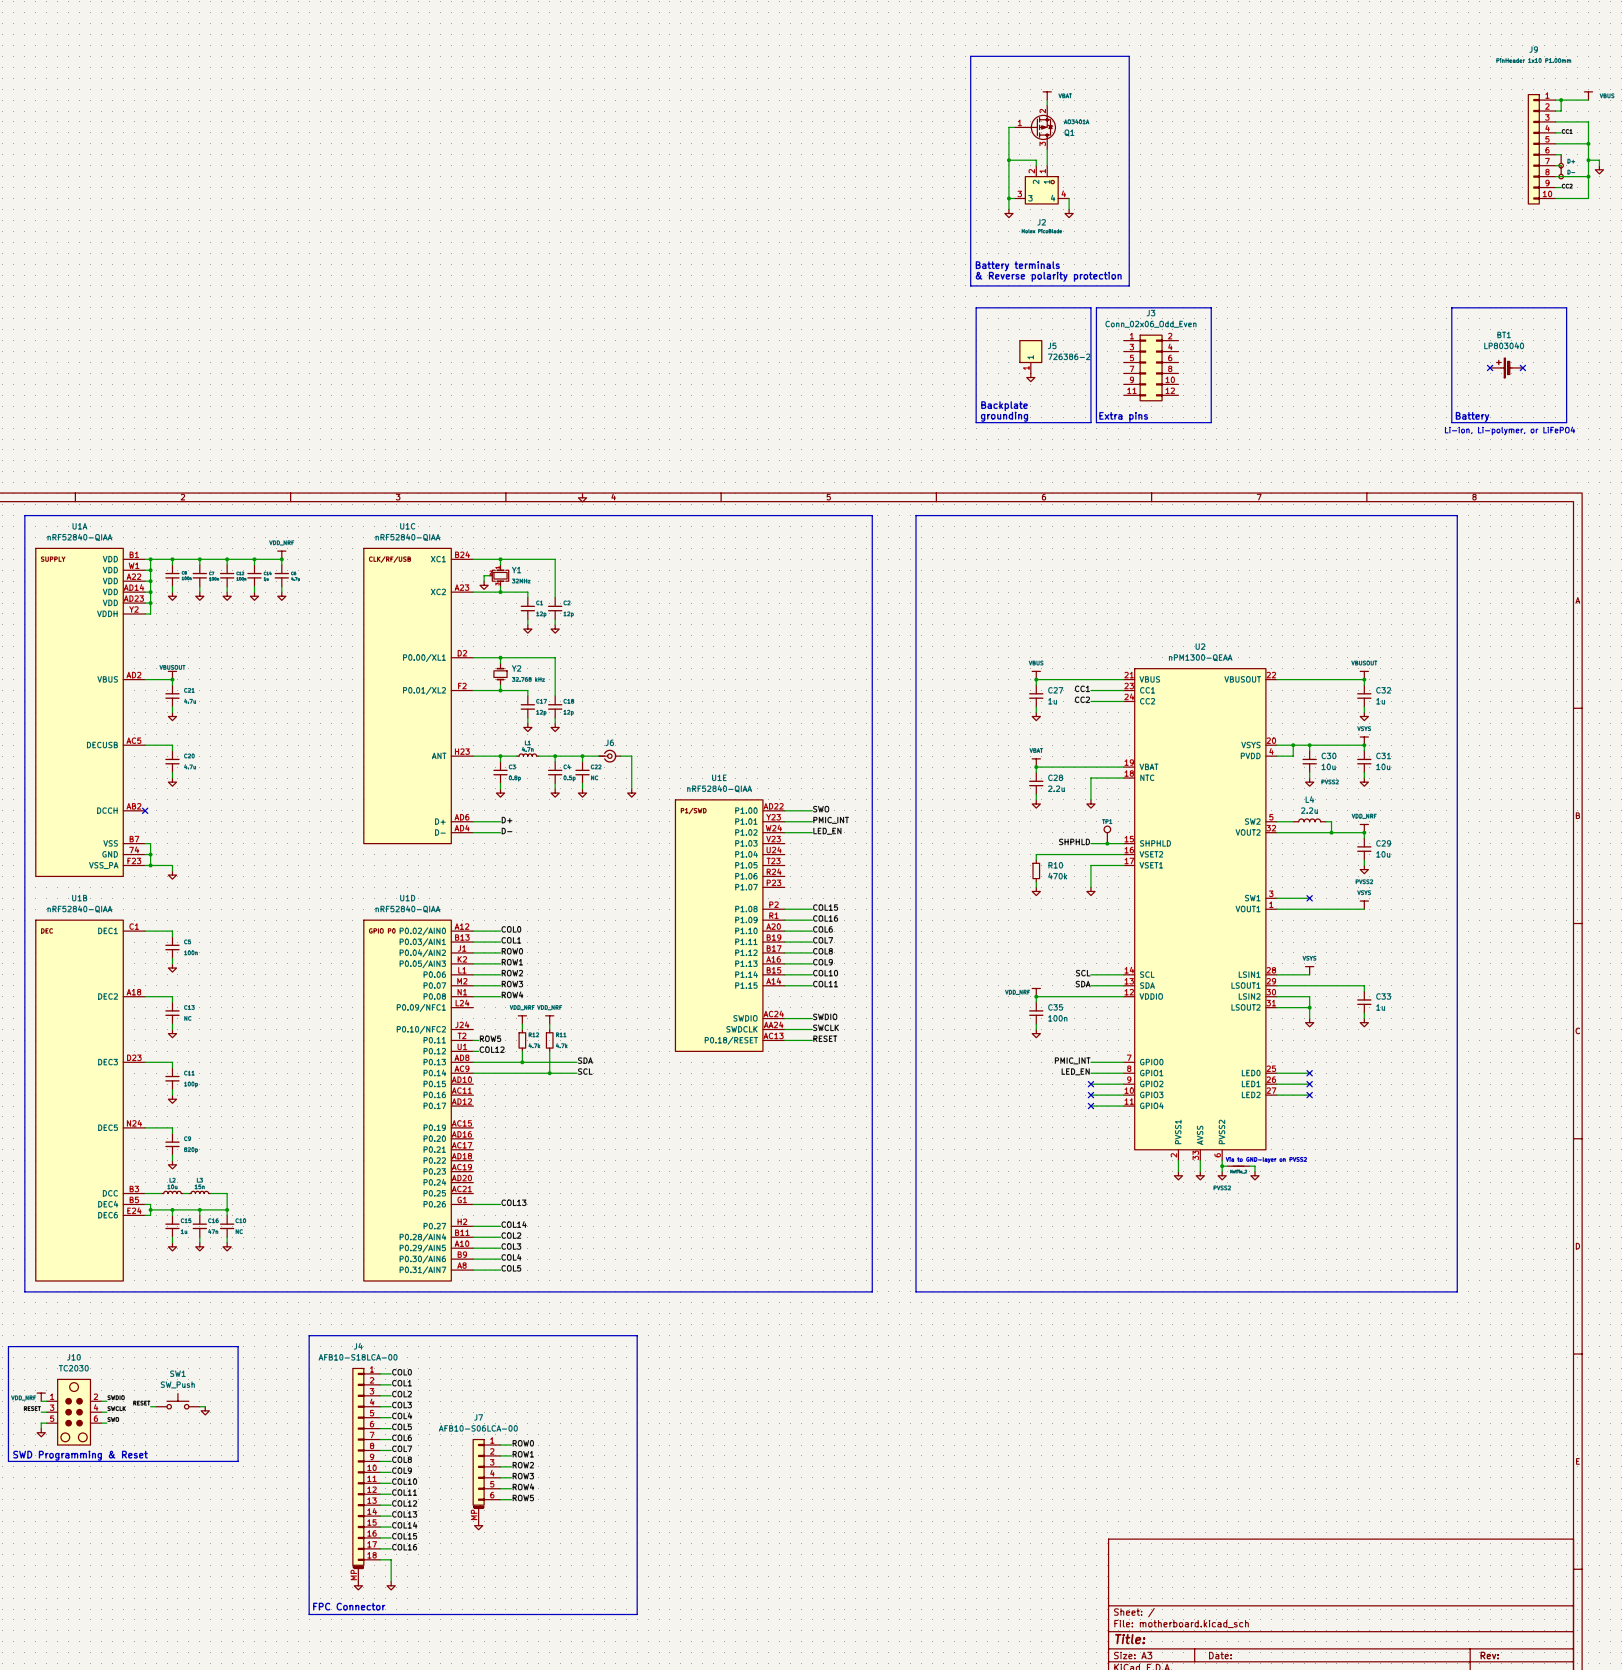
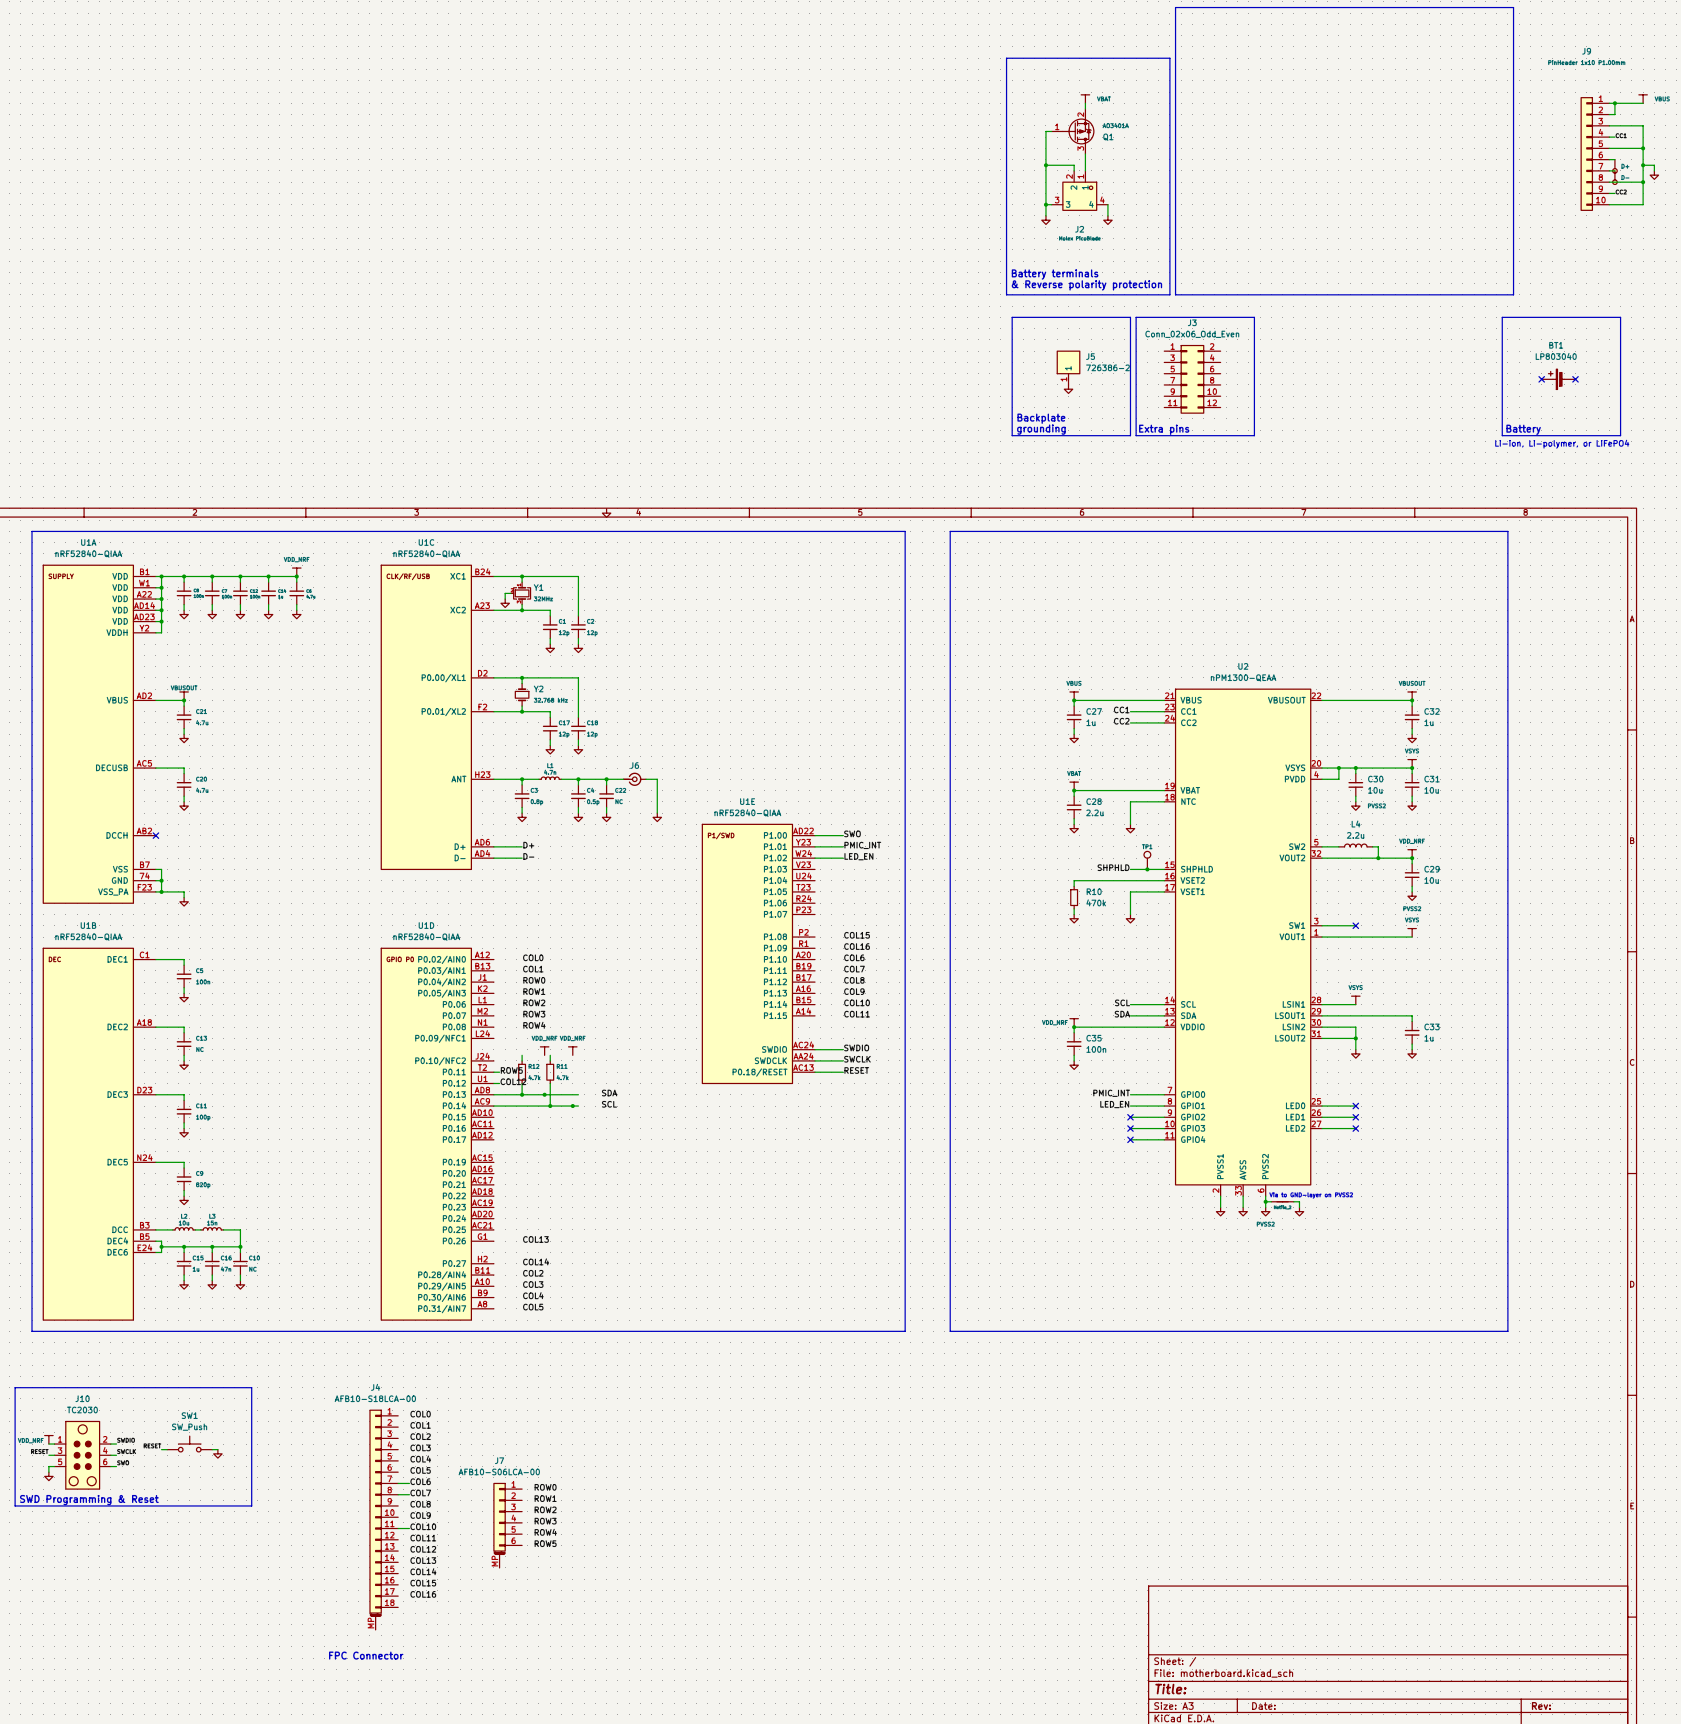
line: none -> (1175, 7) (1513, 7) (1513, 294) (1175, 294) (1175, 7)
wire: (784, 909) (812, 909) -> none
wire: (784, 920) (812, 920) -> none
wire: (473, 931) (500, 931) -> none
wire: (784, 931) (812, 931) -> none
wire: (473, 942) (500, 942) -> none
wire: (784, 942) (812, 942) -> none
wire: (473, 952) (500, 952) -> none
wire: (784, 952) (812, 952) -> none
wire: (473, 963) (500, 963) -> none
wire: (784, 963) (812, 963) -> none
wire: (473, 974) (500, 974) -> none
wire: (784, 974) (812, 974) -> none
wire: (473, 985) (500, 985) -> none
wire: (784, 985) (812, 985) -> none
wire: (473, 996) (500, 996) -> none
wire: (522, 1024) (522, 1029) -> (522, 1055) (522, 1060)
wire: (549, 1024) (549, 1029) -> (550, 1055) (550, 1060)
part position: (522, 1040) -> (522, 1072)
part position: (549, 1040) -> (550, 1072)
wire: (522, 1051) (522, 1062) -> (522, 1083) (522, 1094)
wire: (549, 1051) (549, 1073) -> (550, 1083) (550, 1106)
junction: none -> (522, 1094)
wire: (555, 1062) (577, 1062) -> none
junction: none -> (550, 1106)
wire: (555, 1073) (577, 1073) -> none
wire: (473, 1204) (500, 1204) -> none
wire: (473, 1226) (500, 1226) -> none
wire: (473, 1237) (500, 1237) -> none
wire: (473, 1248) (500, 1248) -> none
wire: (473, 1259) (500, 1259) -> none
wire: (473, 1270) (500, 1270) -> none
line: (309, 1335) (637, 1335) (637, 1614) (309, 1614) (309, 1335) -> none
wire: (380, 1373) (391, 1373) -> none
wire: (380, 1384) (391, 1384) -> none
wire: (380, 1395) (391, 1395) -> none
wire: (380, 1406) (391, 1406) -> none
wire: (380, 1417) (391, 1417) -> none
wire: (380, 1428) (391, 1428) -> none
wire: (500, 1445) (511, 1445) -> none
wire: (500, 1455) (511, 1455) -> none
wire: (380, 1461) (391, 1461) -> none
wire: (500, 1466) (511, 1466) -> none
wire: (380, 1472) (391, 1472) -> none
wire: (500, 1477) (511, 1477) -> none
wire: (500, 1488) (511, 1488) -> none
wire: (380, 1494) (391, 1494) -> none
wire: (500, 1499) (511, 1499) -> none
wire: (380, 1505) (391, 1505) -> none
wire: (380, 1516) (391, 1516) -> none
power symbol: (478, 1525) -> none
wire: (380, 1527) (391, 1527) -> none
wire: (380, 1537) (391, 1537) -> none
wire: (380, 1548) (391, 1548) -> none
wire: (380, 1559) (391, 1559) (391, 1581) -> none
power symbol: (358, 1585) -> none
power symbol: (391, 1585) -> none

